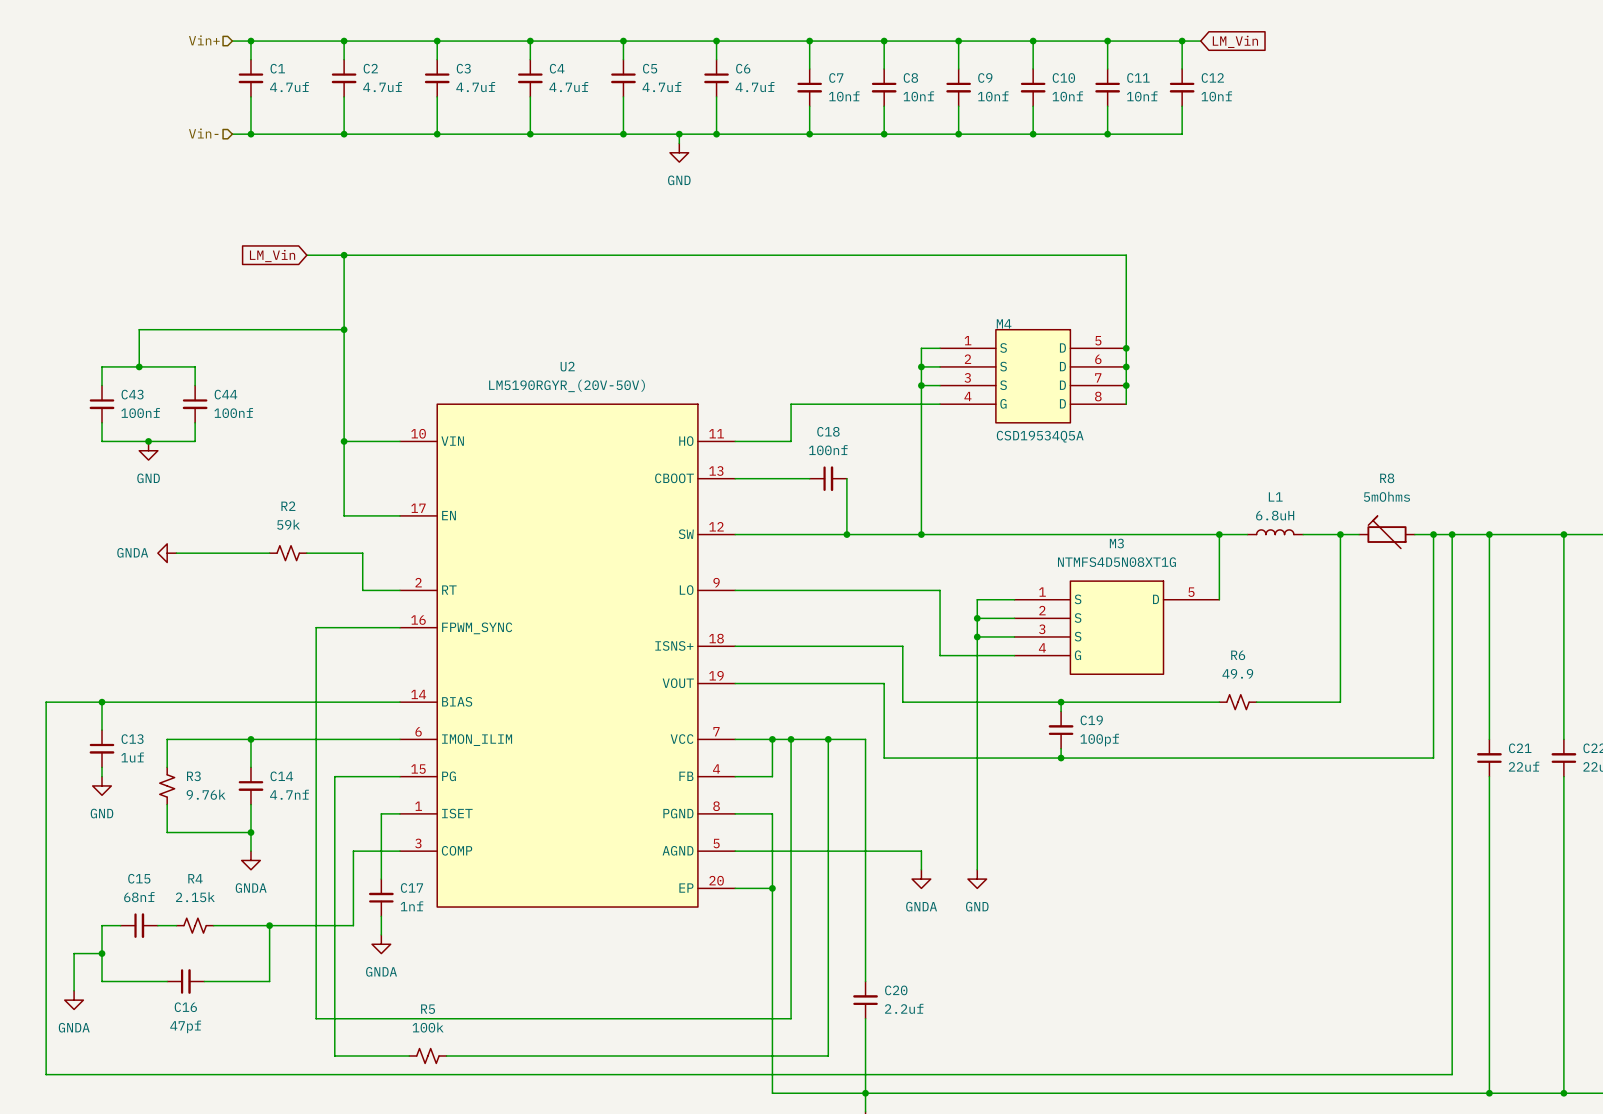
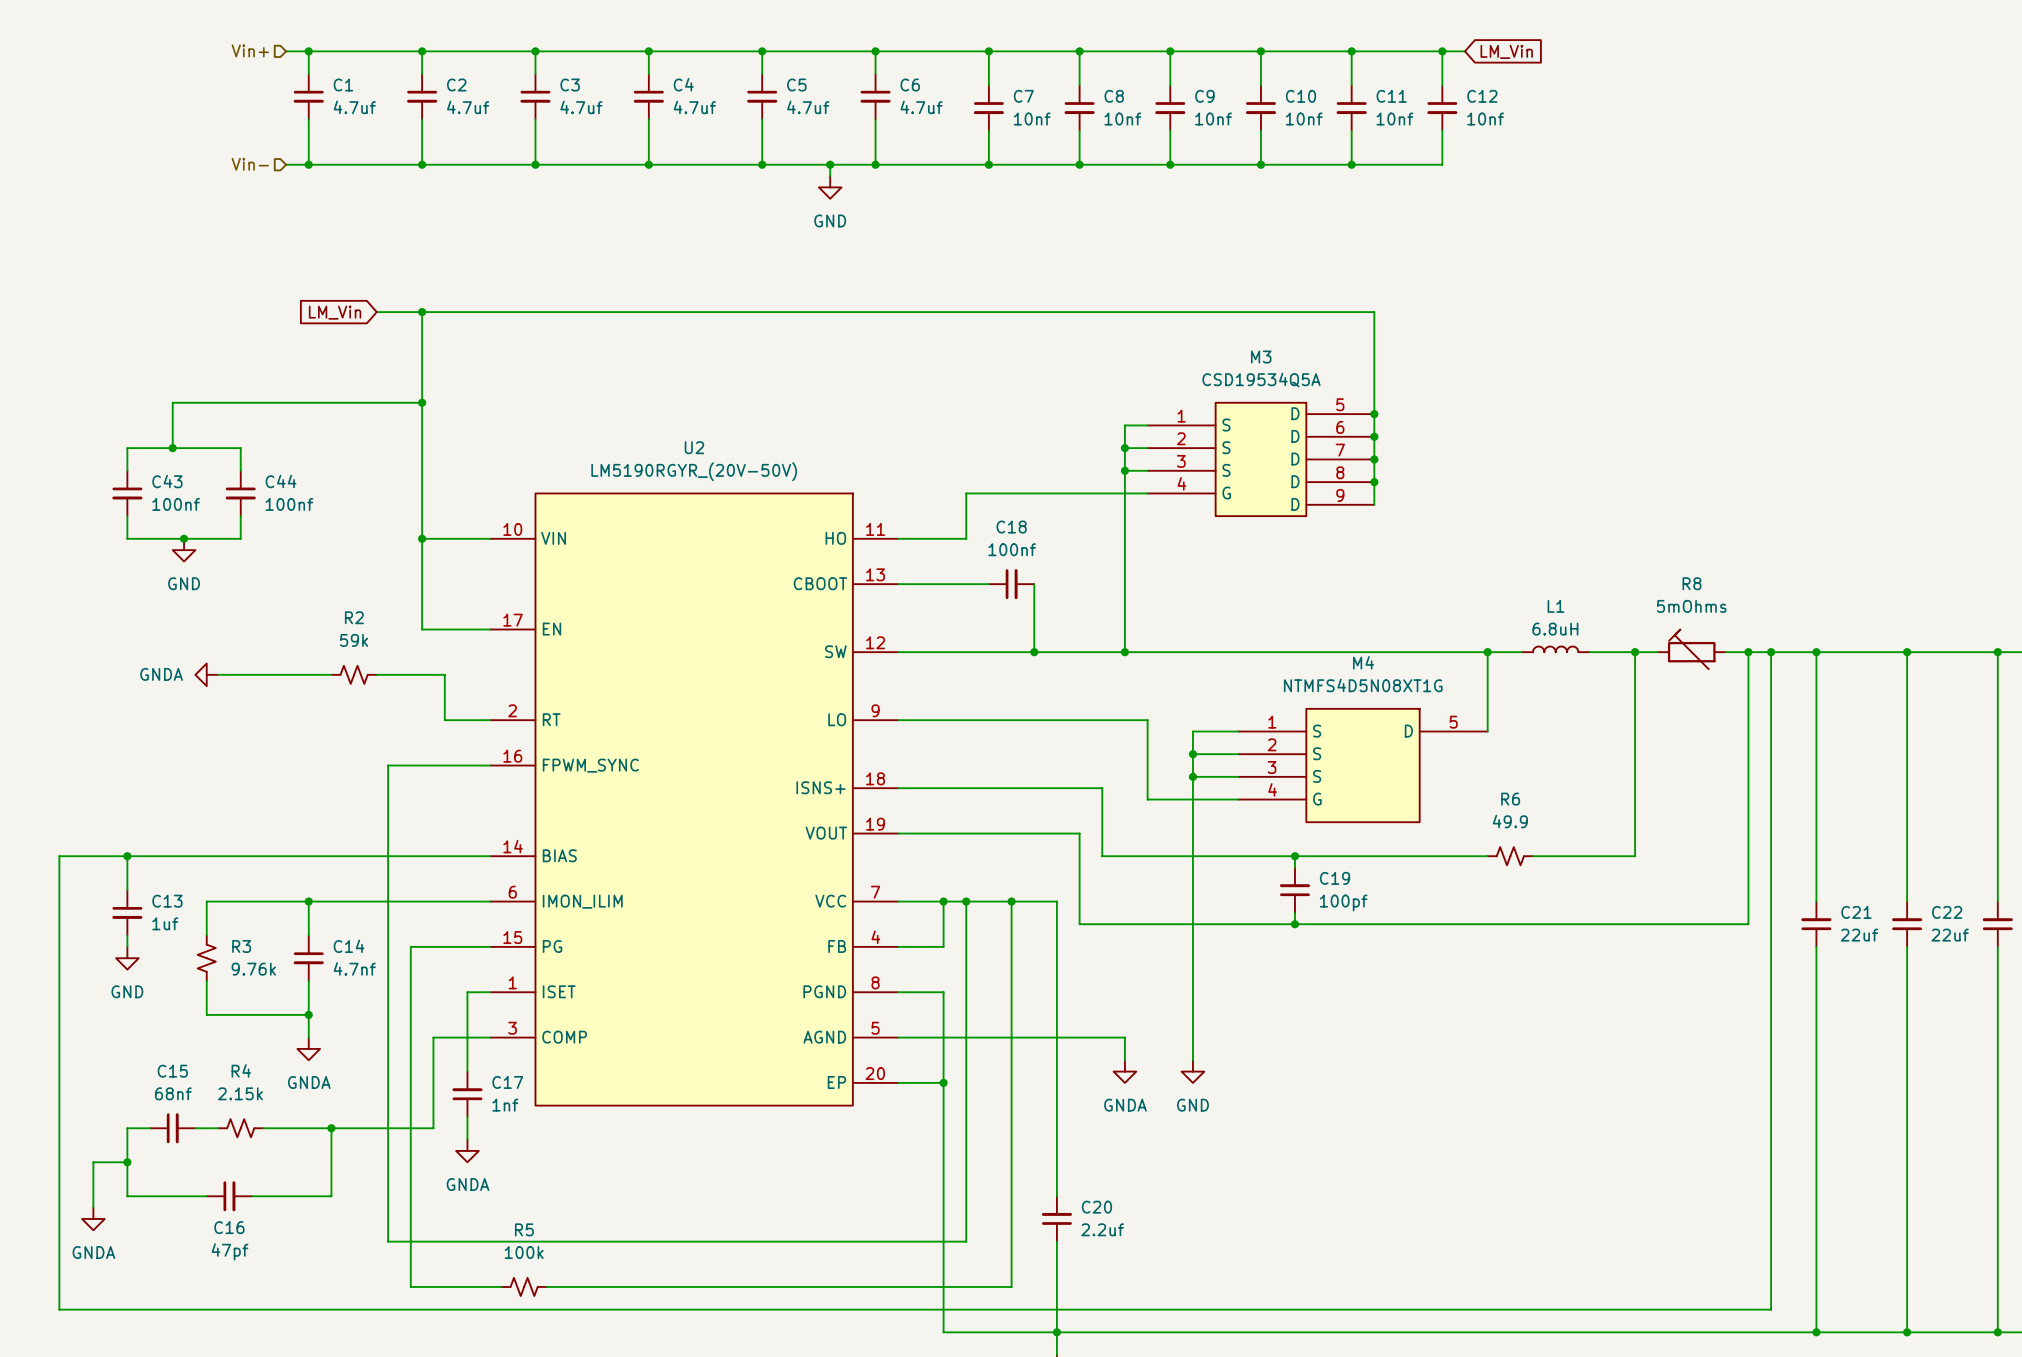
junction: none -> (1374, 414)
junction: (1126, 348) -> none
junction: none -> (1374, 436)
junction: (1126, 366) -> none
M4: CSD19534Q5A (1033, 376) -> none
M3: none -> CSD19534Q5A (1260, 459)
junction: none -> (1374, 459)
junction: (1126, 385) -> none
junction: none -> (1374, 482)
wire: none -> (1374, 493) (1374, 504)
M3 name: M3 (1116, 543) -> M4 (1363, 662)

